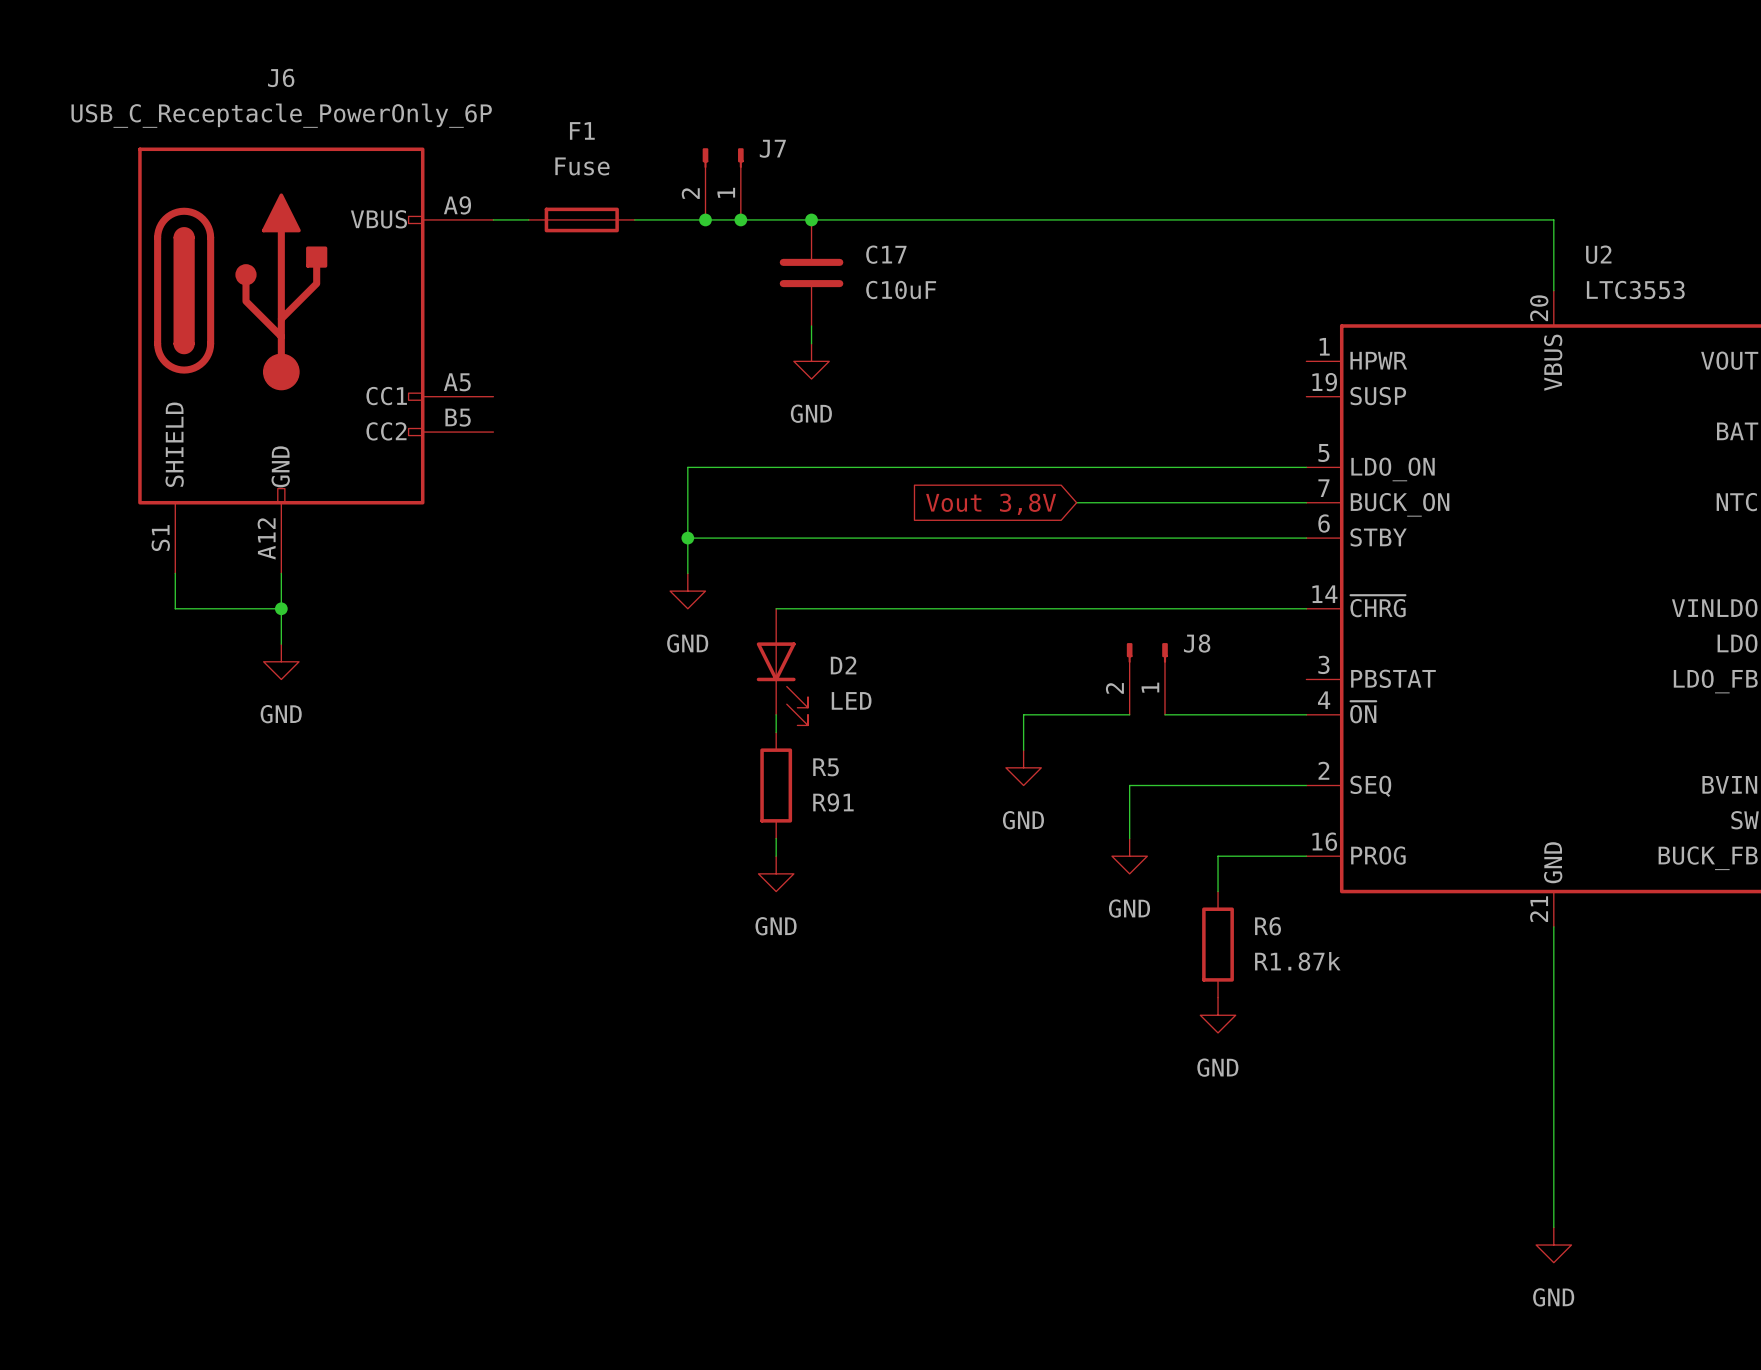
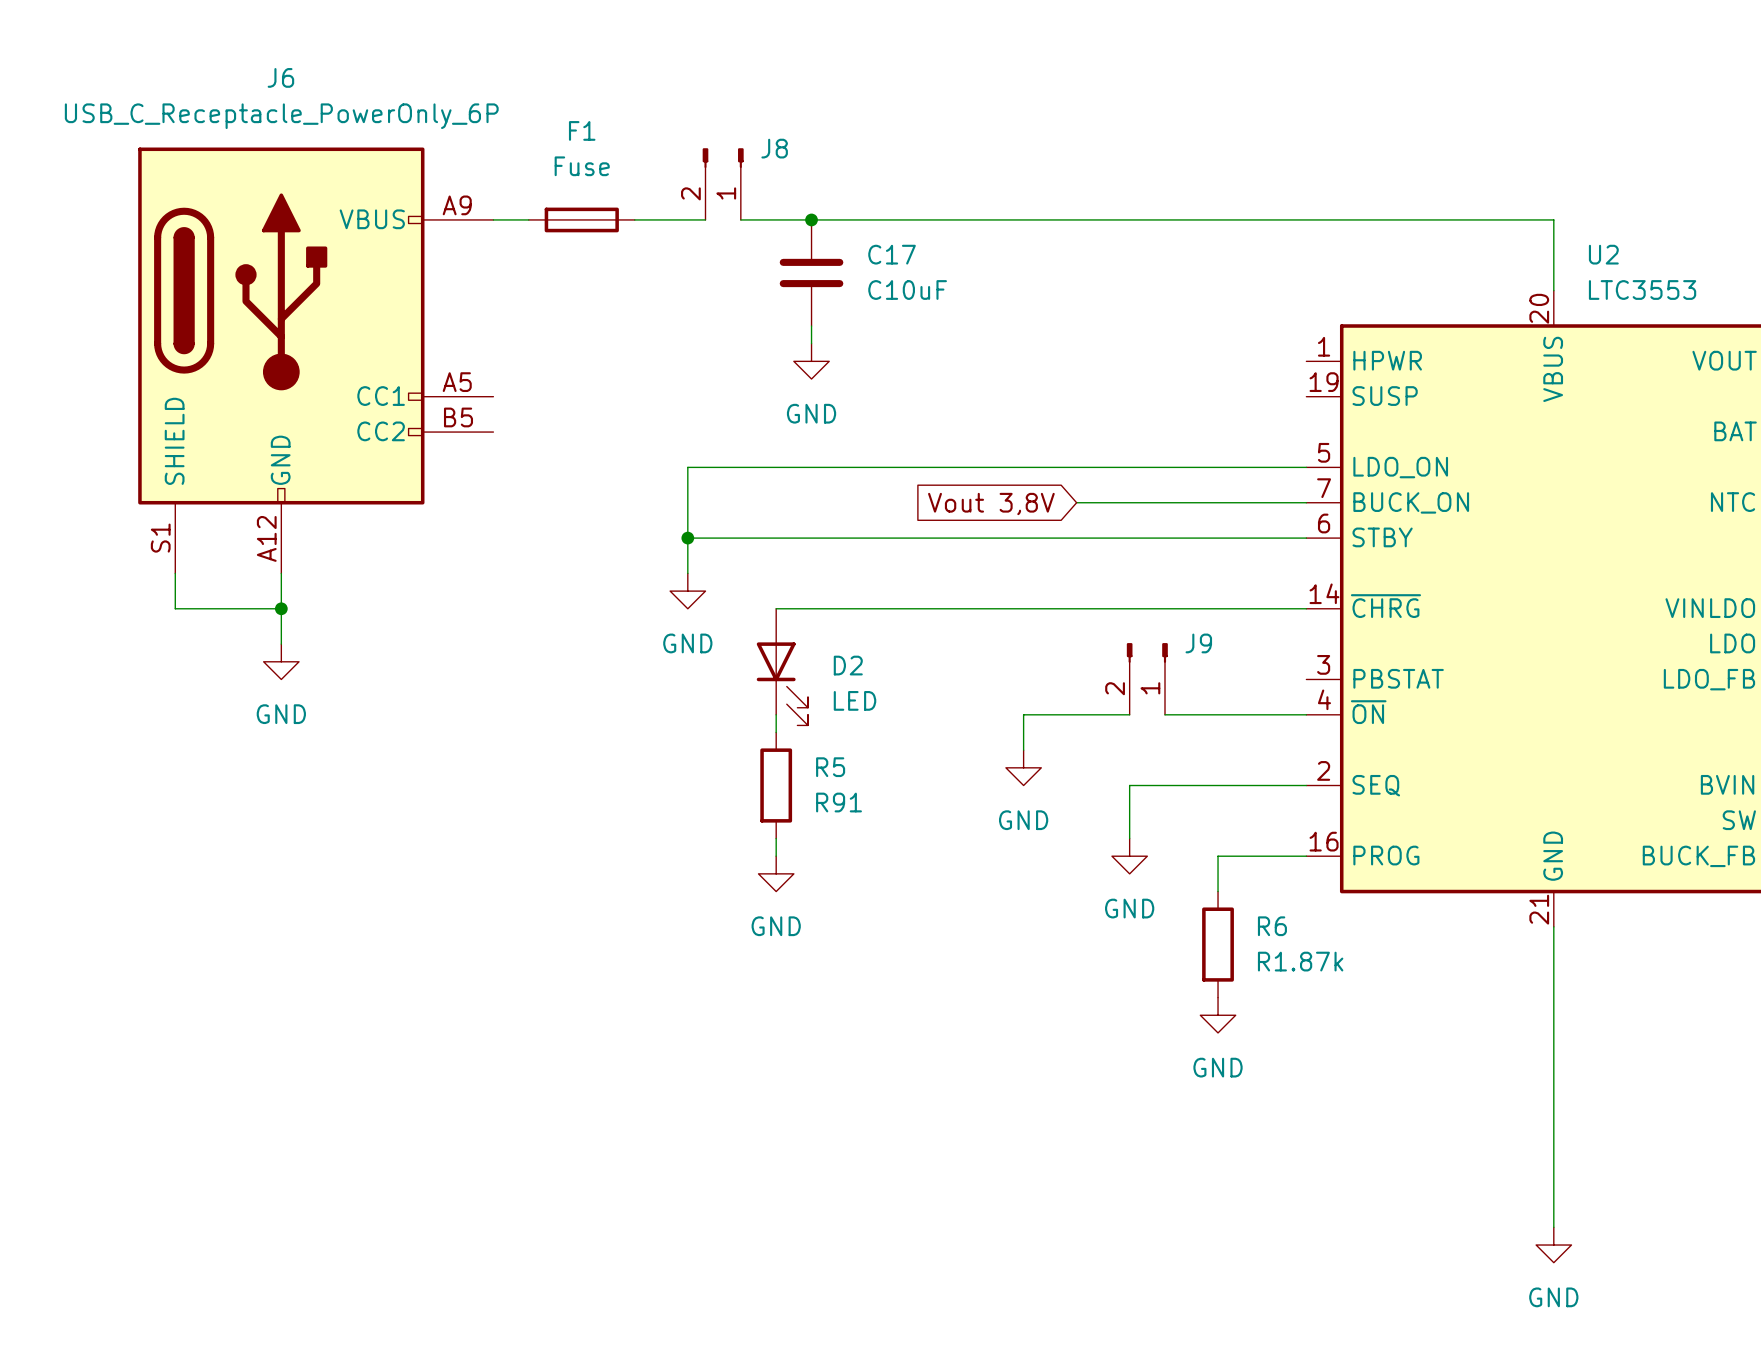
J7 name: J7 (772, 148) -> J8 (774, 148)
wire: (705, 219) (740, 219) -> none
junction: (705, 219) -> none
junction: (740, 219) -> none
J8 name: J8 (1197, 643) -> J9 (1198, 643)

